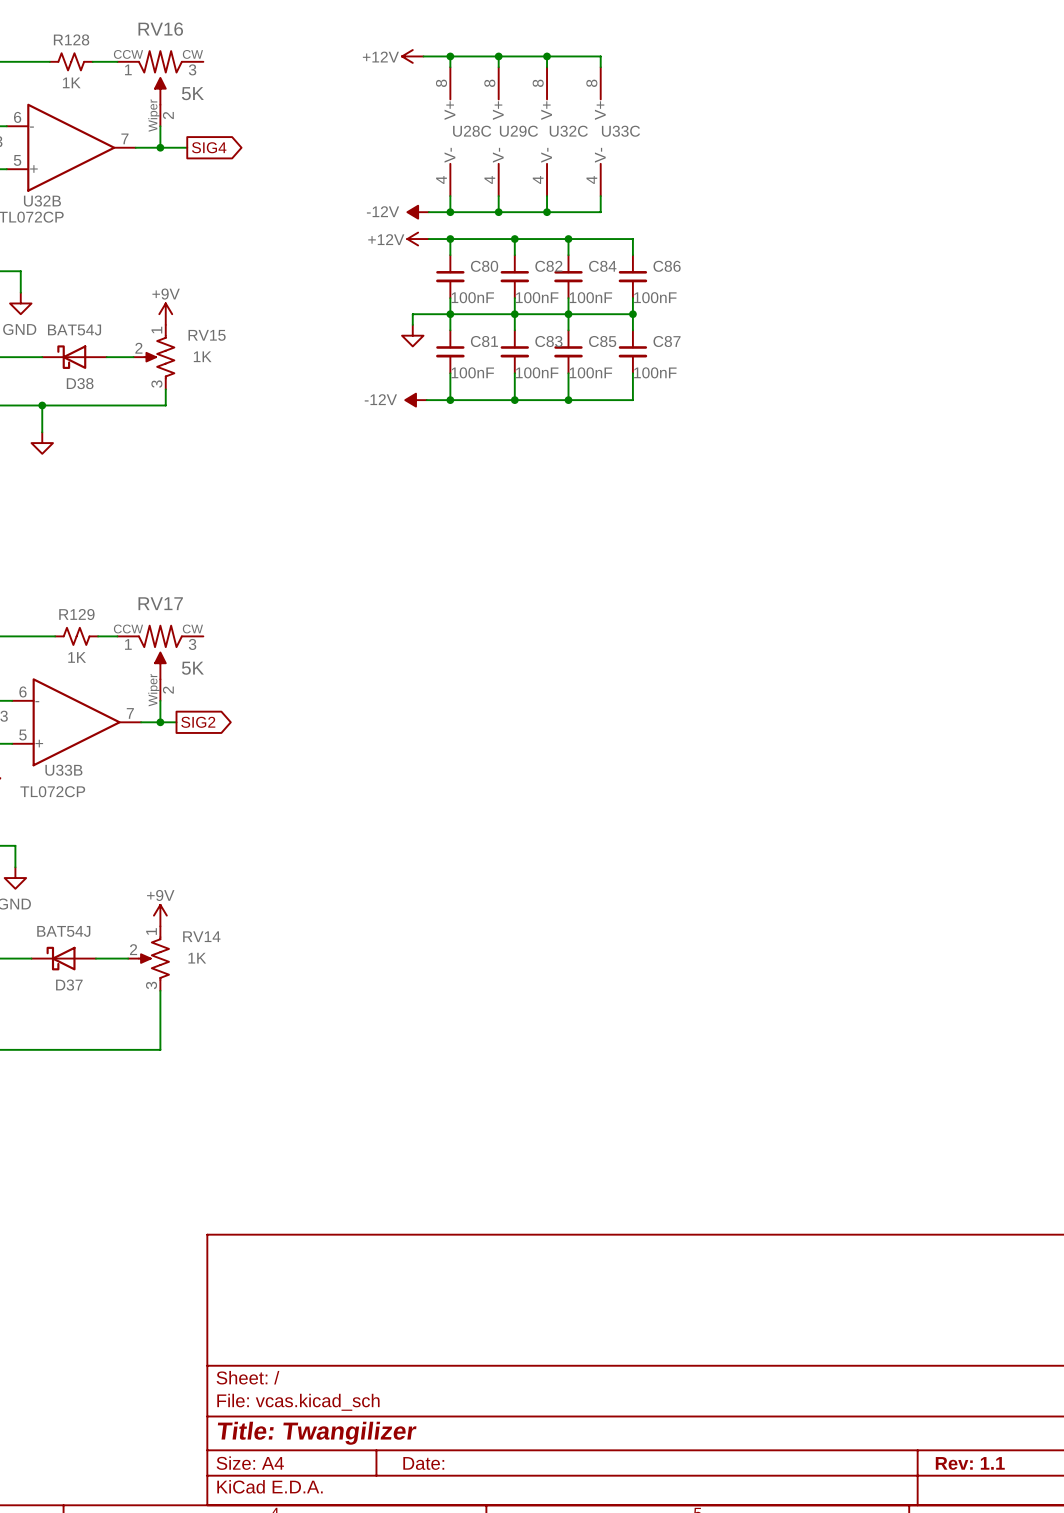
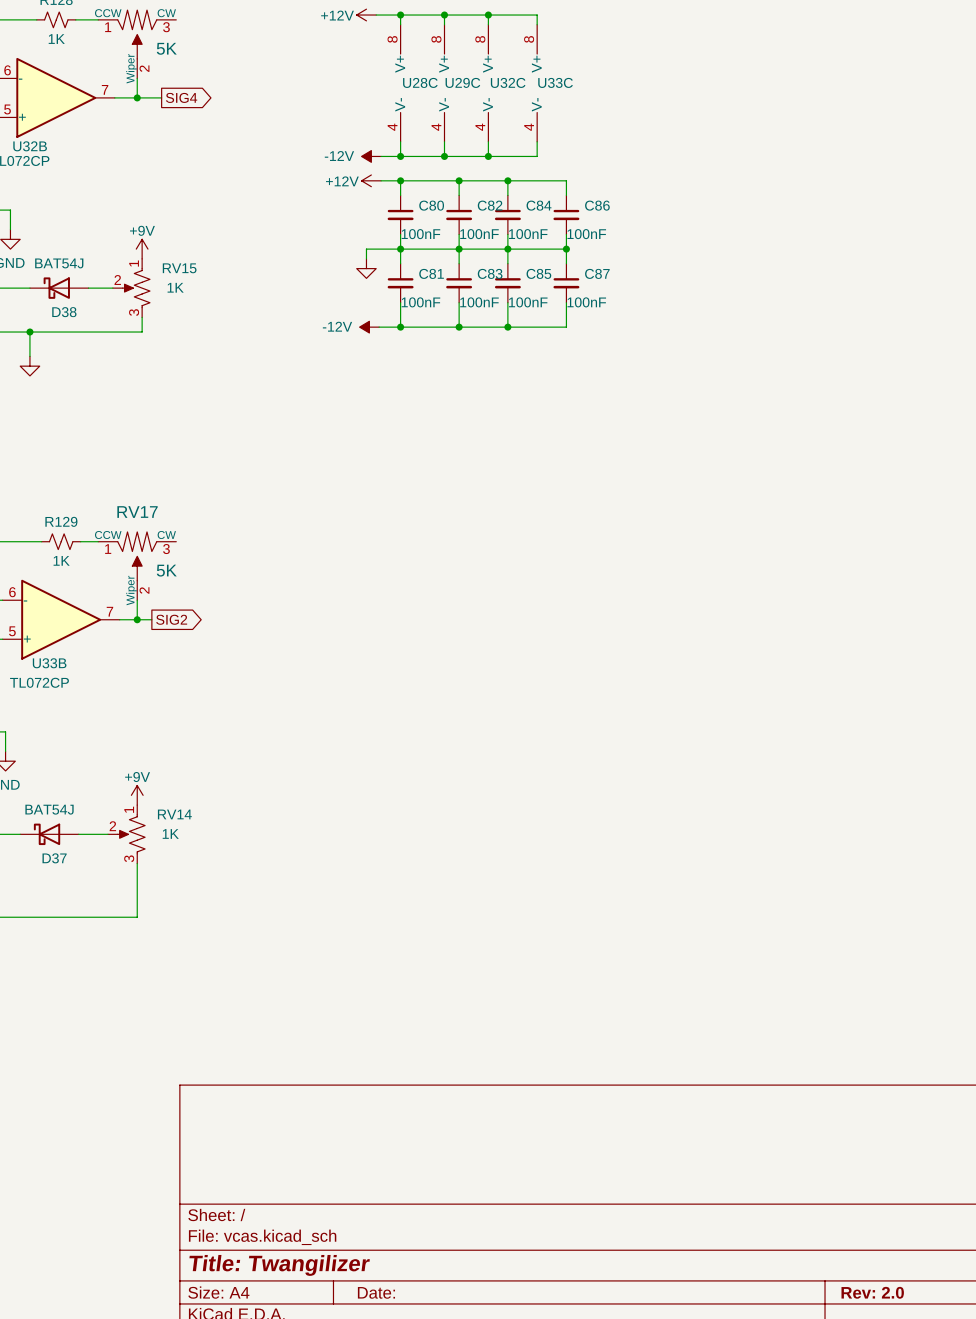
title block: Rev: 1.1 (970, 1463) -> Rev: 2.0 (872, 1292)

